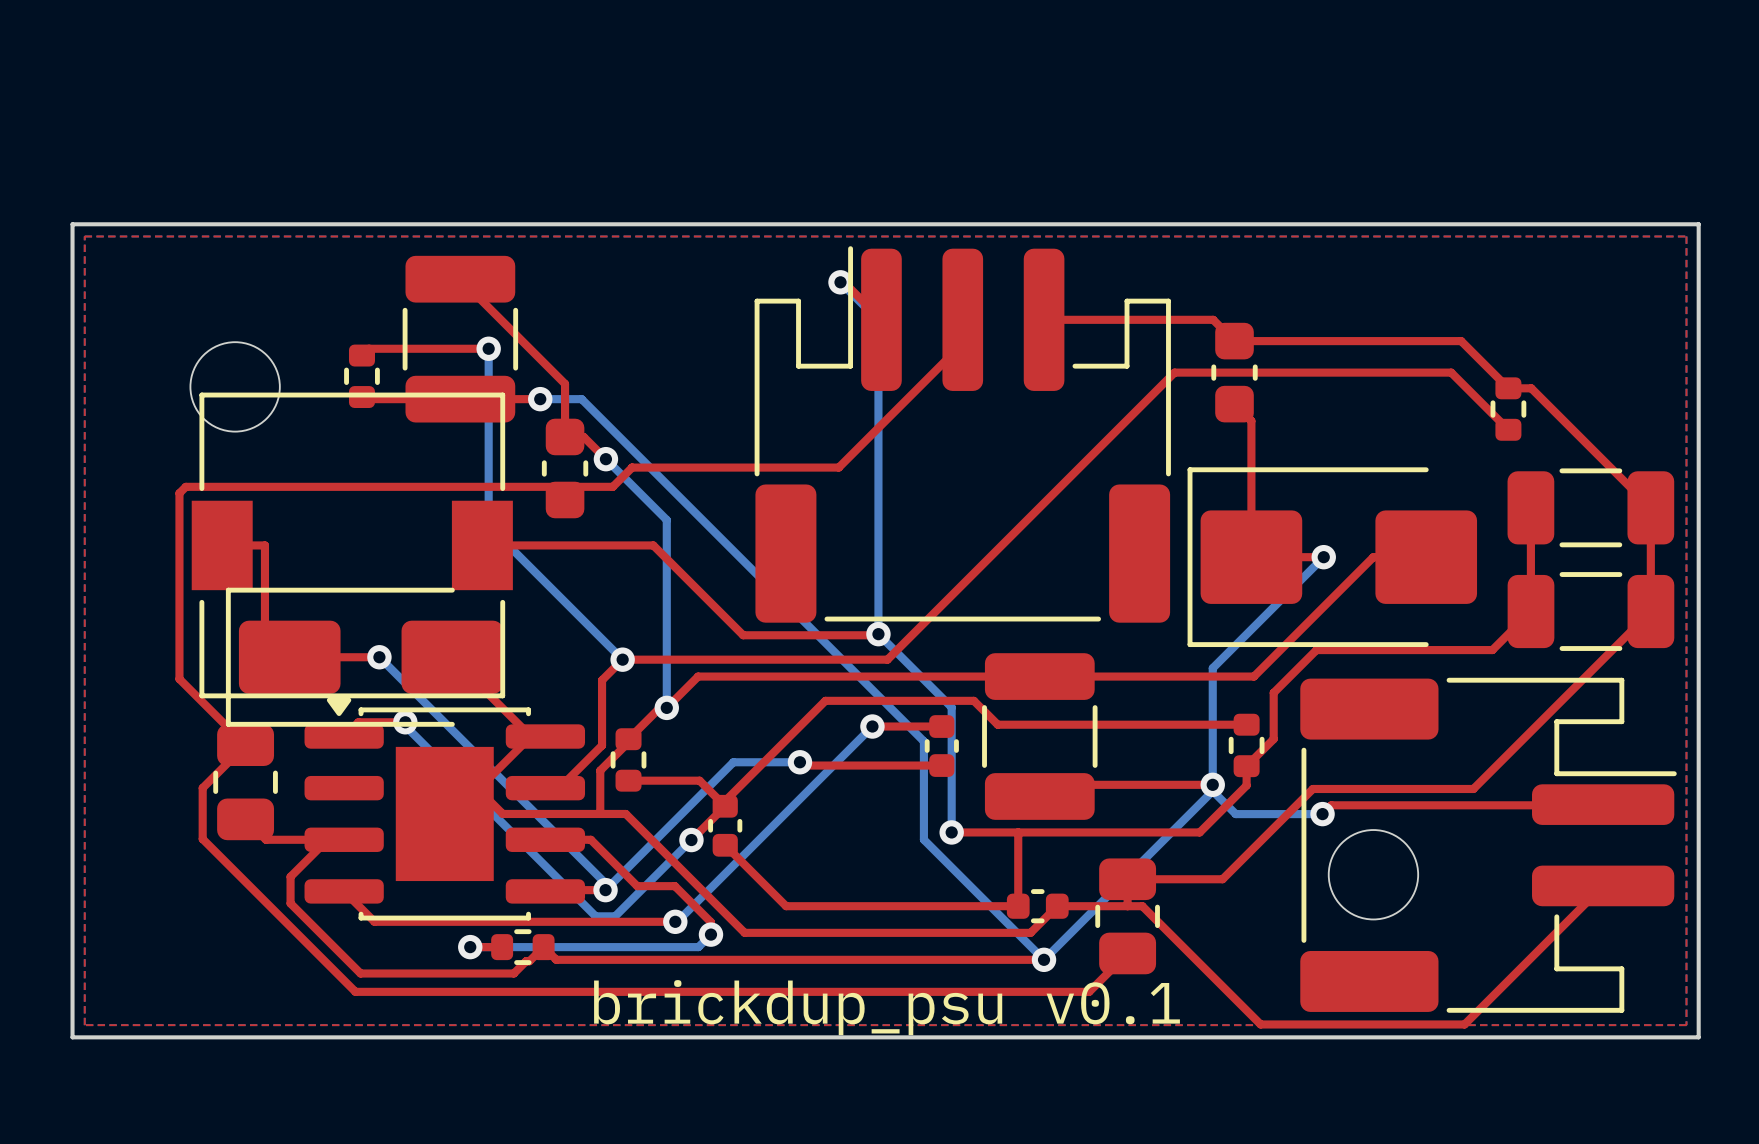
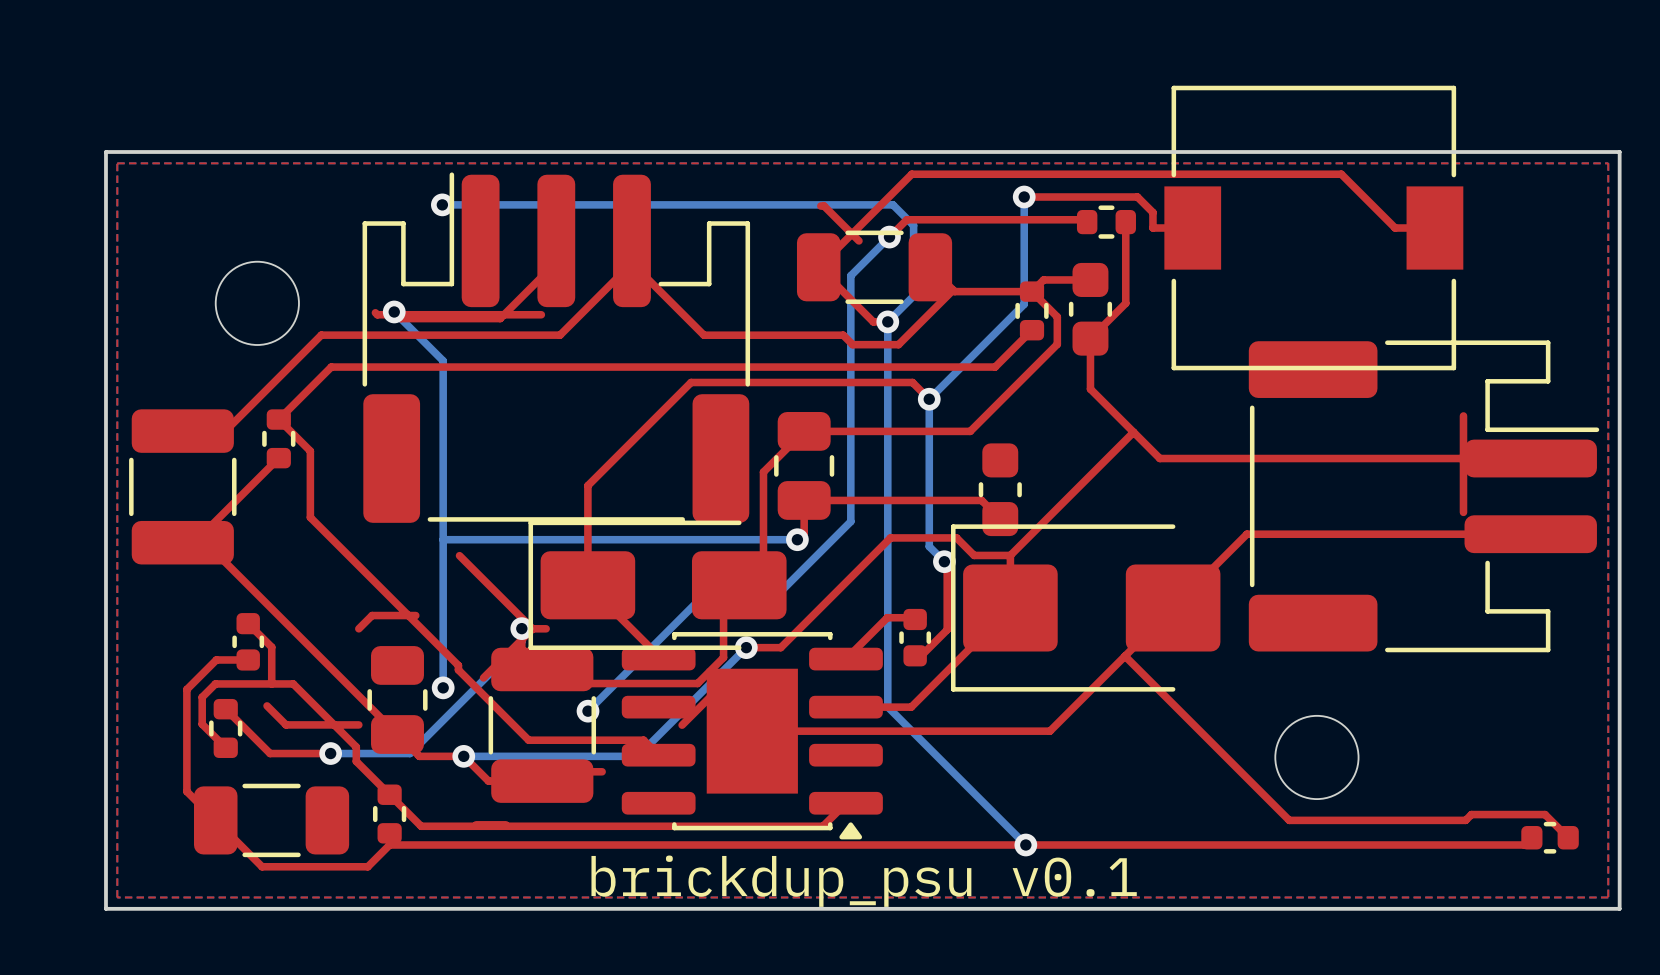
top track: none -> (1024, 197) (1137, 197) (1152, 212) (1152, 228) (1192, 228)
bottom track: none -> (1024, 197) (1024, 304) (929, 399) (929, 546) (944, 561)
via: none -> (1024, 197)
top track: (460, 279) (565, 383) (565, 436) (583, 436) (605, 459) -> none
bottom track: none -> (442, 204) (892, 204) (913, 225) (913, 296) (887, 321) (887, 706) (1025, 845)
via: none -> (442, 204)
bottom track: (840, 282) (878, 320) (878, 634) (951, 707) (951, 832) -> none
via: (840, 282) -> none
top track: none -> (1087, 222) (1084, 219) (906, 219) (889, 237)
part: none -> (1106, 222)
top track: none -> (1125, 222) (1125, 303) (1090, 338) (1090, 389) (1159, 458) (1530, 458)
part: none -> (1313, 228)
top track: none -> (1434, 228) (1395, 228) (1341, 174) (911, 174) (818, 267) (873, 321) (887, 321)
bottom track: none -> (889, 237) (850, 275) (850, 521) (777, 594) (704, 594) (588, 711)
via: none -> (889, 237)
top track: none -> (556, 240) (556, 262) (500, 318) (400, 318) (394, 311)
top track: (962, 319) (962, 343) (838, 467) (632, 467) (612, 486) (185, 486) (179, 493) (179, 679) (245, 745) (202, 788) (202, 839) (355, 991) (1089, 991) (1127, 953) -> none
top track: (1044, 319) (1213, 319) (1234, 341) (1461, 341) (1508, 388) (1531, 388) (1650, 507) (1650, 611) -> none
part: (460, 339) -> none
top track: none -> (631, 263) (560, 335) (321, 335) (225, 431) (182, 431)
top track: none -> (631, 263) (703, 335) (843, 335) (852, 344) (898, 344) (953, 290)
top track: (488, 348) (368, 348) (361, 355) -> none
bottom track: (488, 348) (488, 525) (622, 659) -> none
via: (488, 348) -> none
part: none -> (874, 267)
top track: none -> (1090, 279) (1043, 279) (1032, 291)
top track: none -> (953, 290) (1032, 291)
part position: (1234, 372) -> (1090, 309)
top track: none -> (1032, 291) (1057, 316) (1057, 344) (970, 431) (804, 431) (763, 472) (763, 561) (723, 600) (723, 657) (697, 683) (556, 683) (521, 648) (521, 628)
part position: (361, 376) -> (278, 438)
part: none -> (1032, 310)
bottom track: none -> (394, 311) (443, 360) (443, 687)
via: none -> (394, 311)
bottom track: (540, 399) (581, 399) (923, 741) (923, 839) (1044, 959) (1212, 791) -> none
via: (540, 399) -> none
top track: (1234, 404) (1251, 421) (1251, 557) (1323, 557) -> none
via: none -> (887, 321)
part: (1508, 409) -> none
top track: none -> (1032, 330) (995, 367) (331, 367) (278, 419) (310, 451) (310, 517) (458, 665) (458, 669) (528, 740) (643, 740) (658, 755)
part footprint: [541, 418, 589, 519] -> [362, 172, 751, 523]
top track: (1508, 429) (1451, 372) (1174, 372) (887, 659) (622, 659) (602, 680) (602, 745) (559, 788) (545, 788) -> none
part: (962, 434) -> none
bottom track: (605, 459) (666, 520) (666, 707) -> none
via: (605, 459) -> none
top track: none -> (929, 399) (912, 382) (691, 382) (587, 485) (587, 585) (658, 656) (658, 659)
via: none -> (929, 399)
part: (1590, 507) -> none
top track: none -> (1133, 432) (1010, 555)
top track: (222, 545) (264, 545) (264, 632) (289, 657) (379, 657) -> none
part: (352, 545) -> none
top track: (482, 545) (653, 545) (743, 635) (878, 634) -> none
top track: none -> (278, 458) (211, 525) (211, 548) (419, 756) (463, 756) (488, 781) (542, 781)
bottom track: (1323, 557) (1212, 668) (1212, 791) -> none
via: (1323, 557) -> none
part position: (1332, 557) -> (1085, 607)
top track: (1426, 557) (1373, 557) (1253, 676) (698, 676) (666, 707) (659, 707) (600, 770) (600, 813) -> none
part: none -> (804, 465)
part: none -> (182, 486)
part: none -> (1000, 489)
top track: (1530, 611) (1492, 650) (1316, 650) (1273, 692) (1273, 739) (1246, 766) (1246, 785) (1199, 832) (951, 832) -> none
part: (1590, 611) -> none
top track: (1650, 611) (1473, 788) (1312, 788) (1222, 879) (1127, 879) (1127, 906) -> none
top track: none -> (1000, 519) (981, 500) (804, 500) (804, 532) (797, 539)
via: (878, 634) -> none
top track: none -> (1530, 534) (1246, 534) (1049, 731) (739, 731)
bottom track: none -> (443, 539) (797, 539)
via: none -> (797, 539)
part position: (364, 657) -> (657, 585)
bottom track: (379, 657) (605, 883) (605, 890) (733, 762) (799, 762) -> none
via: (379, 657) -> none
top track: none -> (1010, 555) (1010, 607) (911, 707) (845, 707)
top track: none -> (1010, 555) (974, 555) (956, 537) (890, 537) (780, 647) (746, 647)
via: (622, 659) -> none
top track: none -> (944, 561) (947, 564) (947, 629) (922, 654)
via: none -> (944, 561)
via: (666, 707) -> none
bottom track: (405, 722) (405, 725) (595, 916) (615, 916) (691, 840) -> none
via: (405, 722) -> none
top track: none -> (922, 617) (887, 617) (845, 659)
top track: (1246, 724) (997, 724) (973, 700) (825, 700) (725, 801) (725, 806) (699, 780) (628, 780) -> none
top track: (872, 726) (941, 726) -> none
bottom track: (872, 726) (675, 921) -> none
via: (872, 726) -> none
top track: none -> (248, 623) (271, 647) (271, 683)
bottom track: none -> (521, 628) (521, 641) (410, 753) (330, 753)
via: none -> (521, 628)
part: (1039, 736) -> none
part: (1246, 745) -> none
part: none -> (248, 641)
bottom track: none -> (746, 647) (637, 756) (463, 756)
part: (628, 759) -> none
top track: (799, 762) (803, 765) (941, 765) -> none
via position: (799, 762) -> (746, 647)
top track: none -> (1125, 656) (1289, 820) (1465, 820) (1471, 814) (1545, 814) (1568, 837)
top track: none -> (248, 659) (216, 659) (186, 689) (186, 791) (262, 866) (367, 866) (389, 845)
part position: (245, 782) -> (397, 699)
top track: (1212, 784) (1051, 784) (1039, 796) -> none
via: (1212, 784) -> none
bottom track: (1212, 791) (1235, 814) (1322, 814) -> none
via: none -> (443, 687)
top track: (1603, 804) (1331, 805) (1322, 814) -> none
part rotation: 0° (444, 809) -> 180° (752, 735)
part position: (444, 809) -> (752, 735)
top track: (444, 813) (469, 789) (478, 789) (502, 813) (625, 813) (744, 932) (1030, 932) (1057, 906) (1142, 906) (1260, 1024) (1464, 1024) (1603, 885) -> none
via: (1322, 814) -> none
top track: none -> (225, 709) (270, 753) (330, 753)
via: none -> (588, 711)
part: (725, 825) -> none
via: (951, 832) -> none
top track: (1018, 832) (1018, 906) (786, 906) (725, 845) -> none
top track: (327, 839) (290, 876) (290, 903) (360, 973) (513, 973) (543, 947) (556, 959) (1044, 959) -> none
top track: (545, 839) (590, 839) (637, 886) (674, 886) (710, 922) (710, 934) -> none
part: none -> (542, 725)
via: (691, 840) -> none
part: none -> (225, 728)
part position: (1488, 845) -> (1424, 496)
top track: none -> (225, 747) (202, 724) (202, 697) (215, 683) (293, 683) (356, 746) (356, 761) (421, 826) (822, 826) (845, 803)
via: none -> (330, 753)
via: none -> (463, 756)
via: (605, 890) -> none
top track: (344, 891) (374, 921) (675, 921) -> none
part: (1037, 906) -> none
part: (1127, 916) -> none
via: (675, 921) -> none
bottom track: (710, 934) (698, 947) (470, 947) -> none
via: (710, 934) -> none
part: none -> (271, 820)
via: (470, 947) -> none
part rotation: 0° (522, 947) -> 90° clockwise (389, 814)
part position: (522, 947) -> (389, 814)
via position: (1044, 959) -> (1025, 845)
top track: none -> (1531, 837) (1524, 845) (389, 845)
part: none -> (1550, 837)

